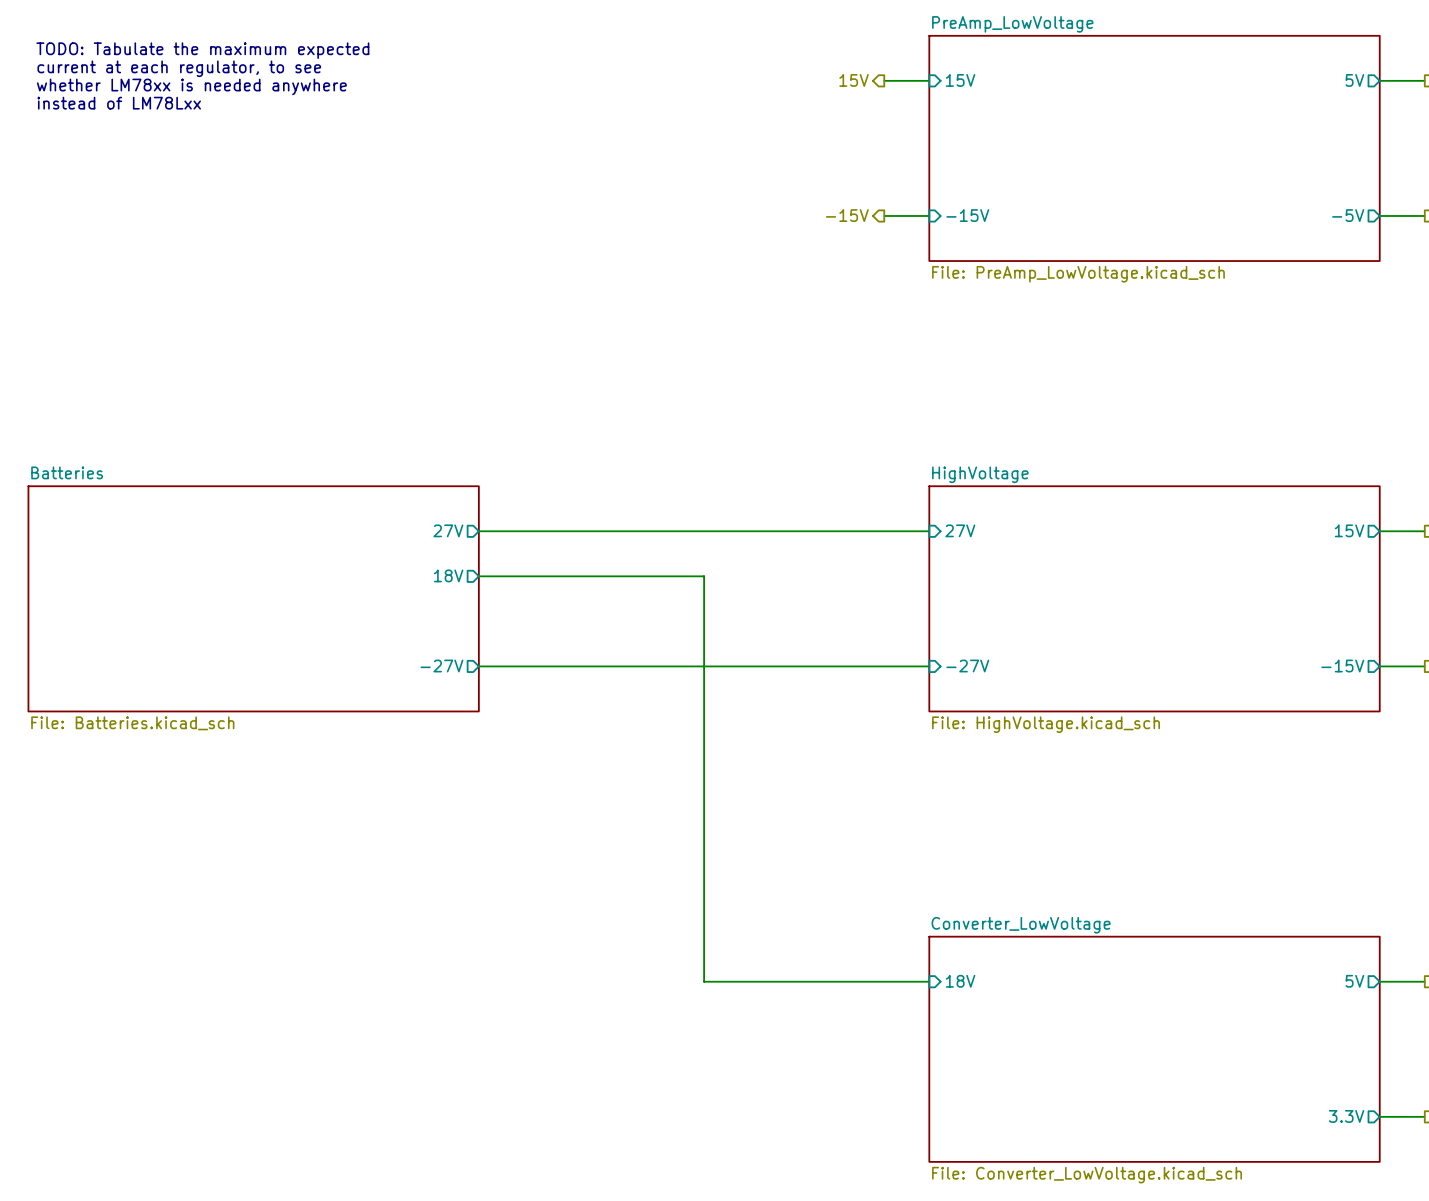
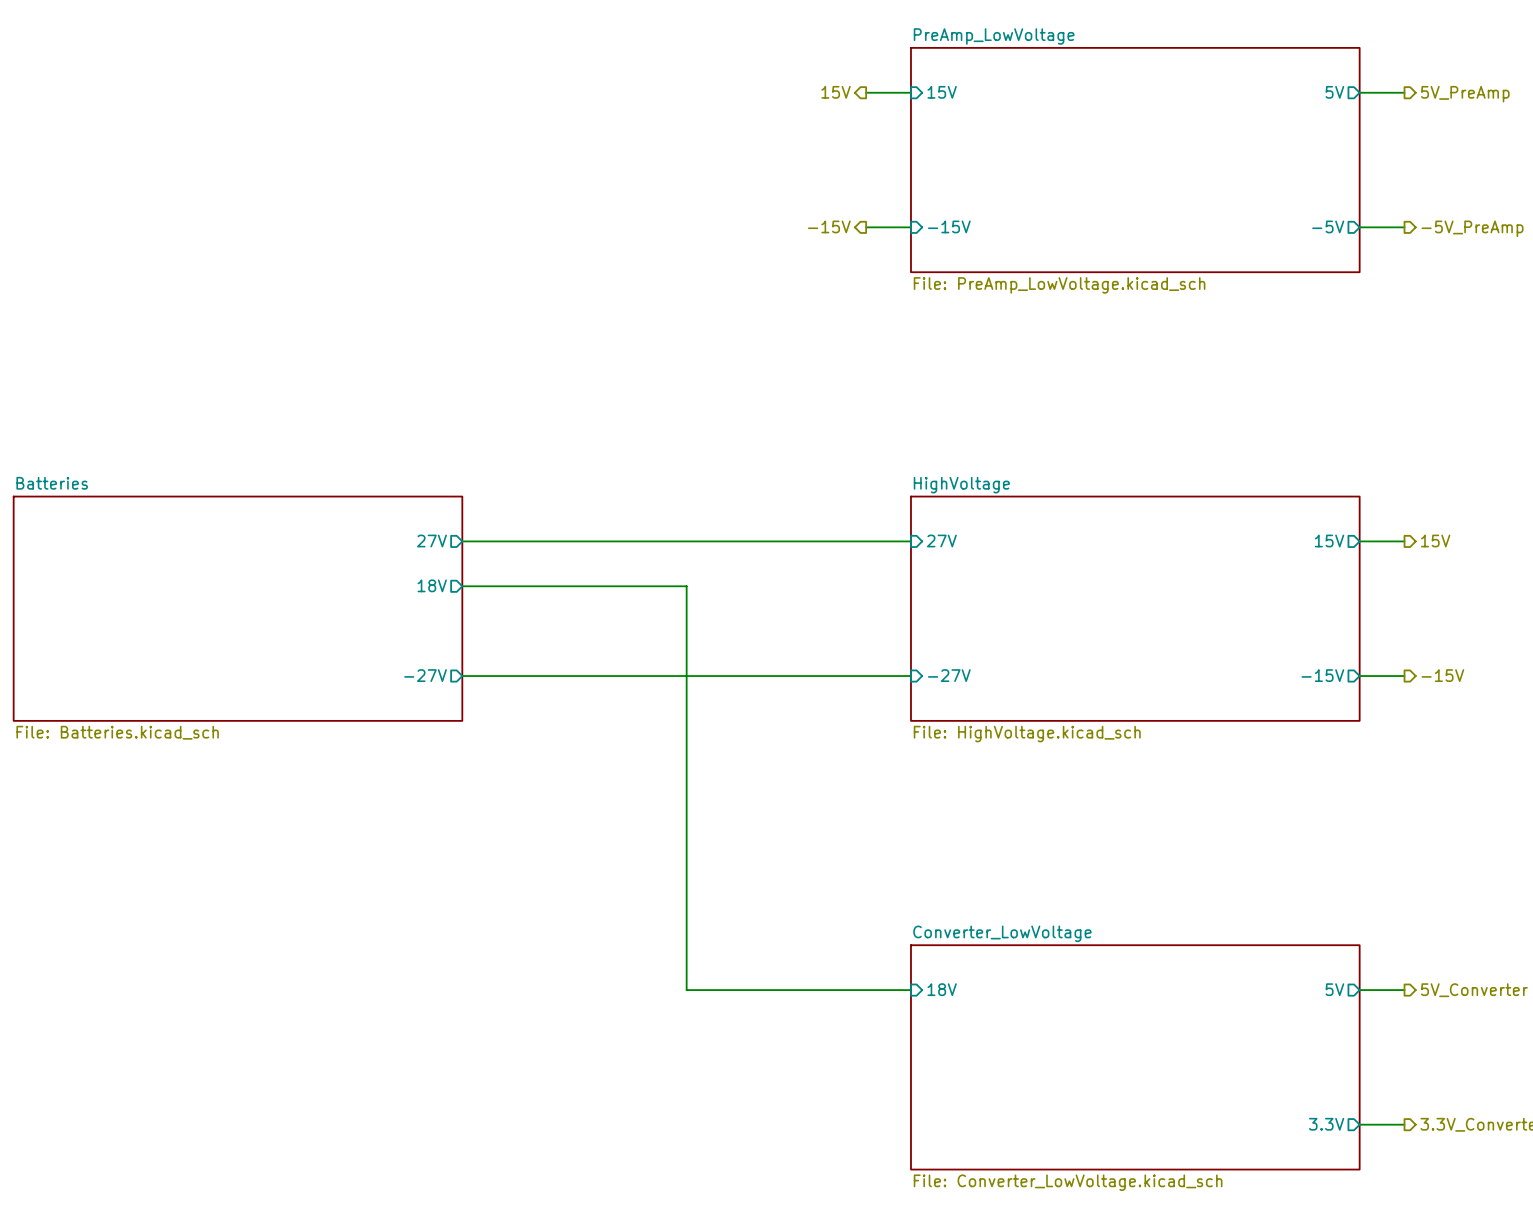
text: TODO: Tabulate the maximum expected (202, 50) -> none
text: current at each regulator, to see (179, 68) -> none
text: whether LM78xx is needed anywhere (191, 86) -> none
text: instead of LM78Lxx (119, 103) -> none

